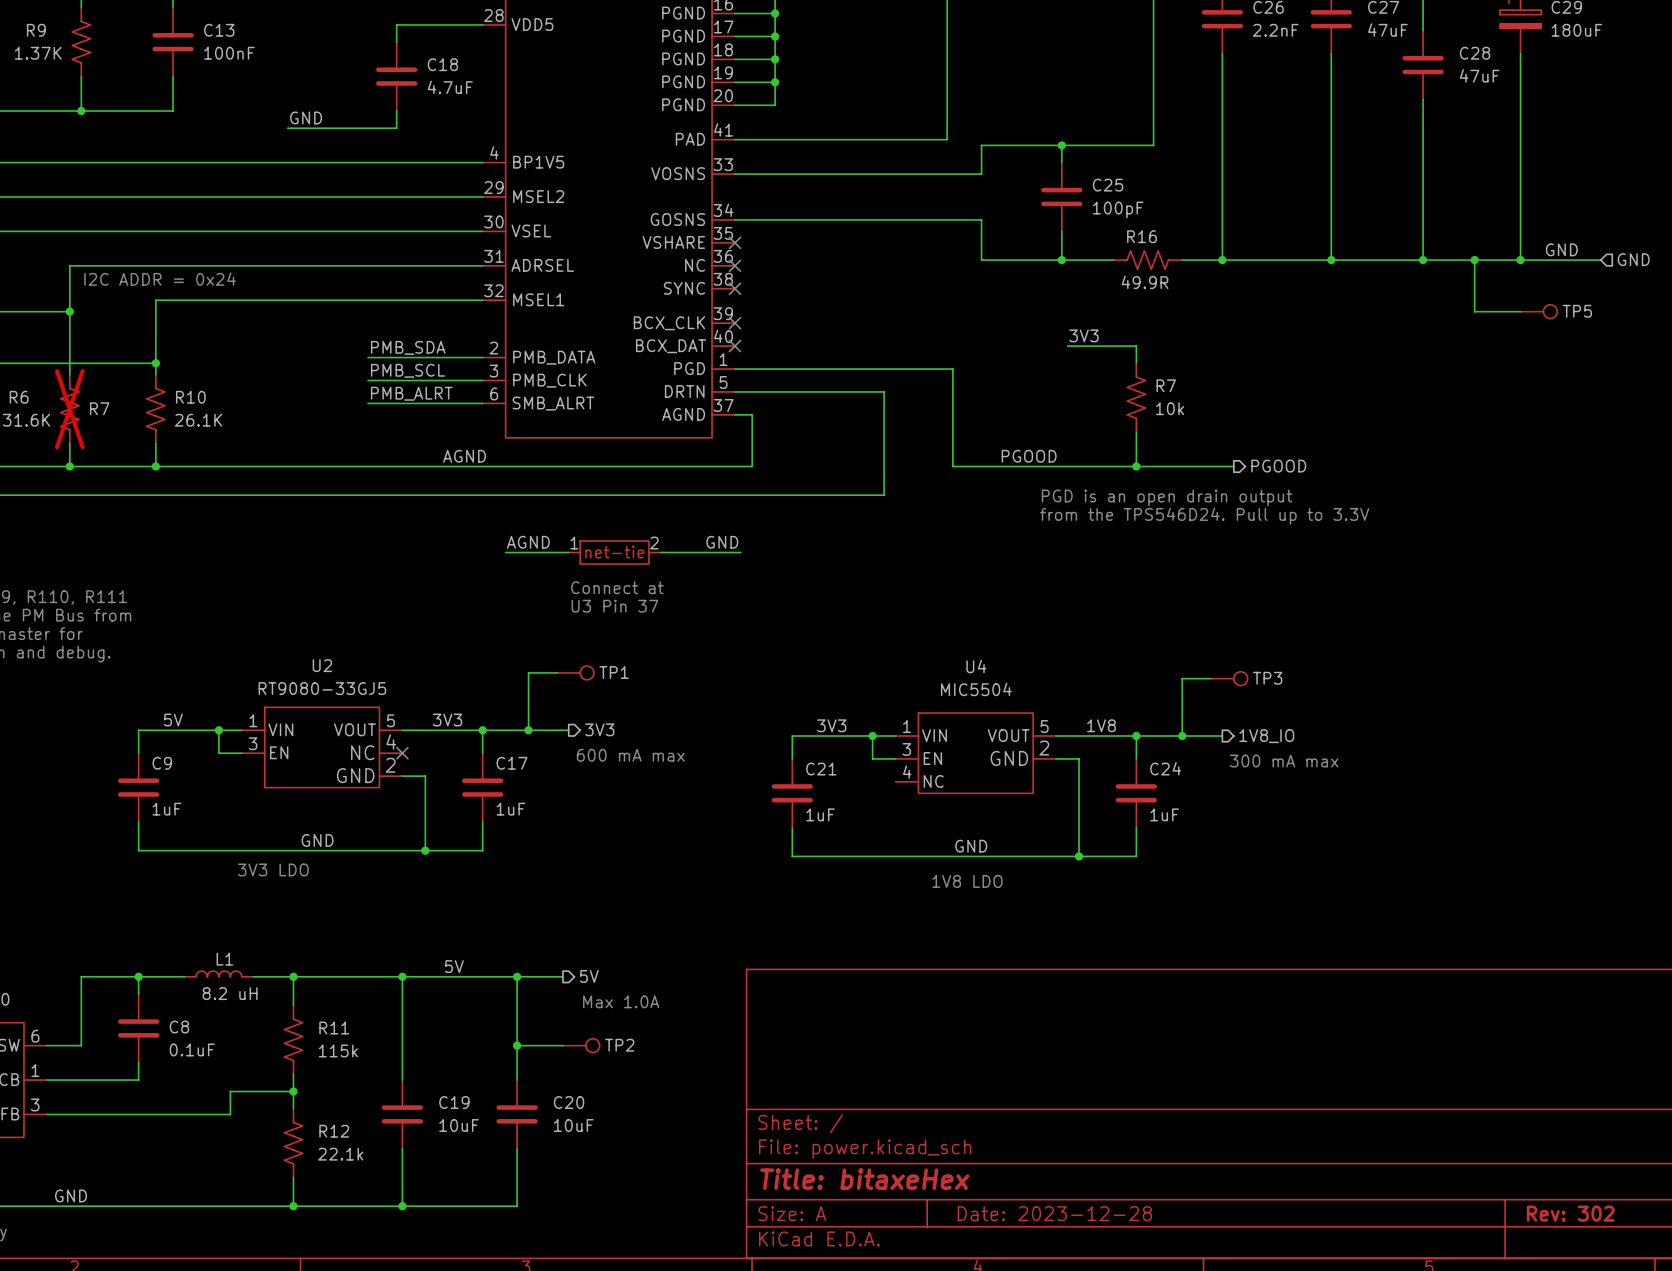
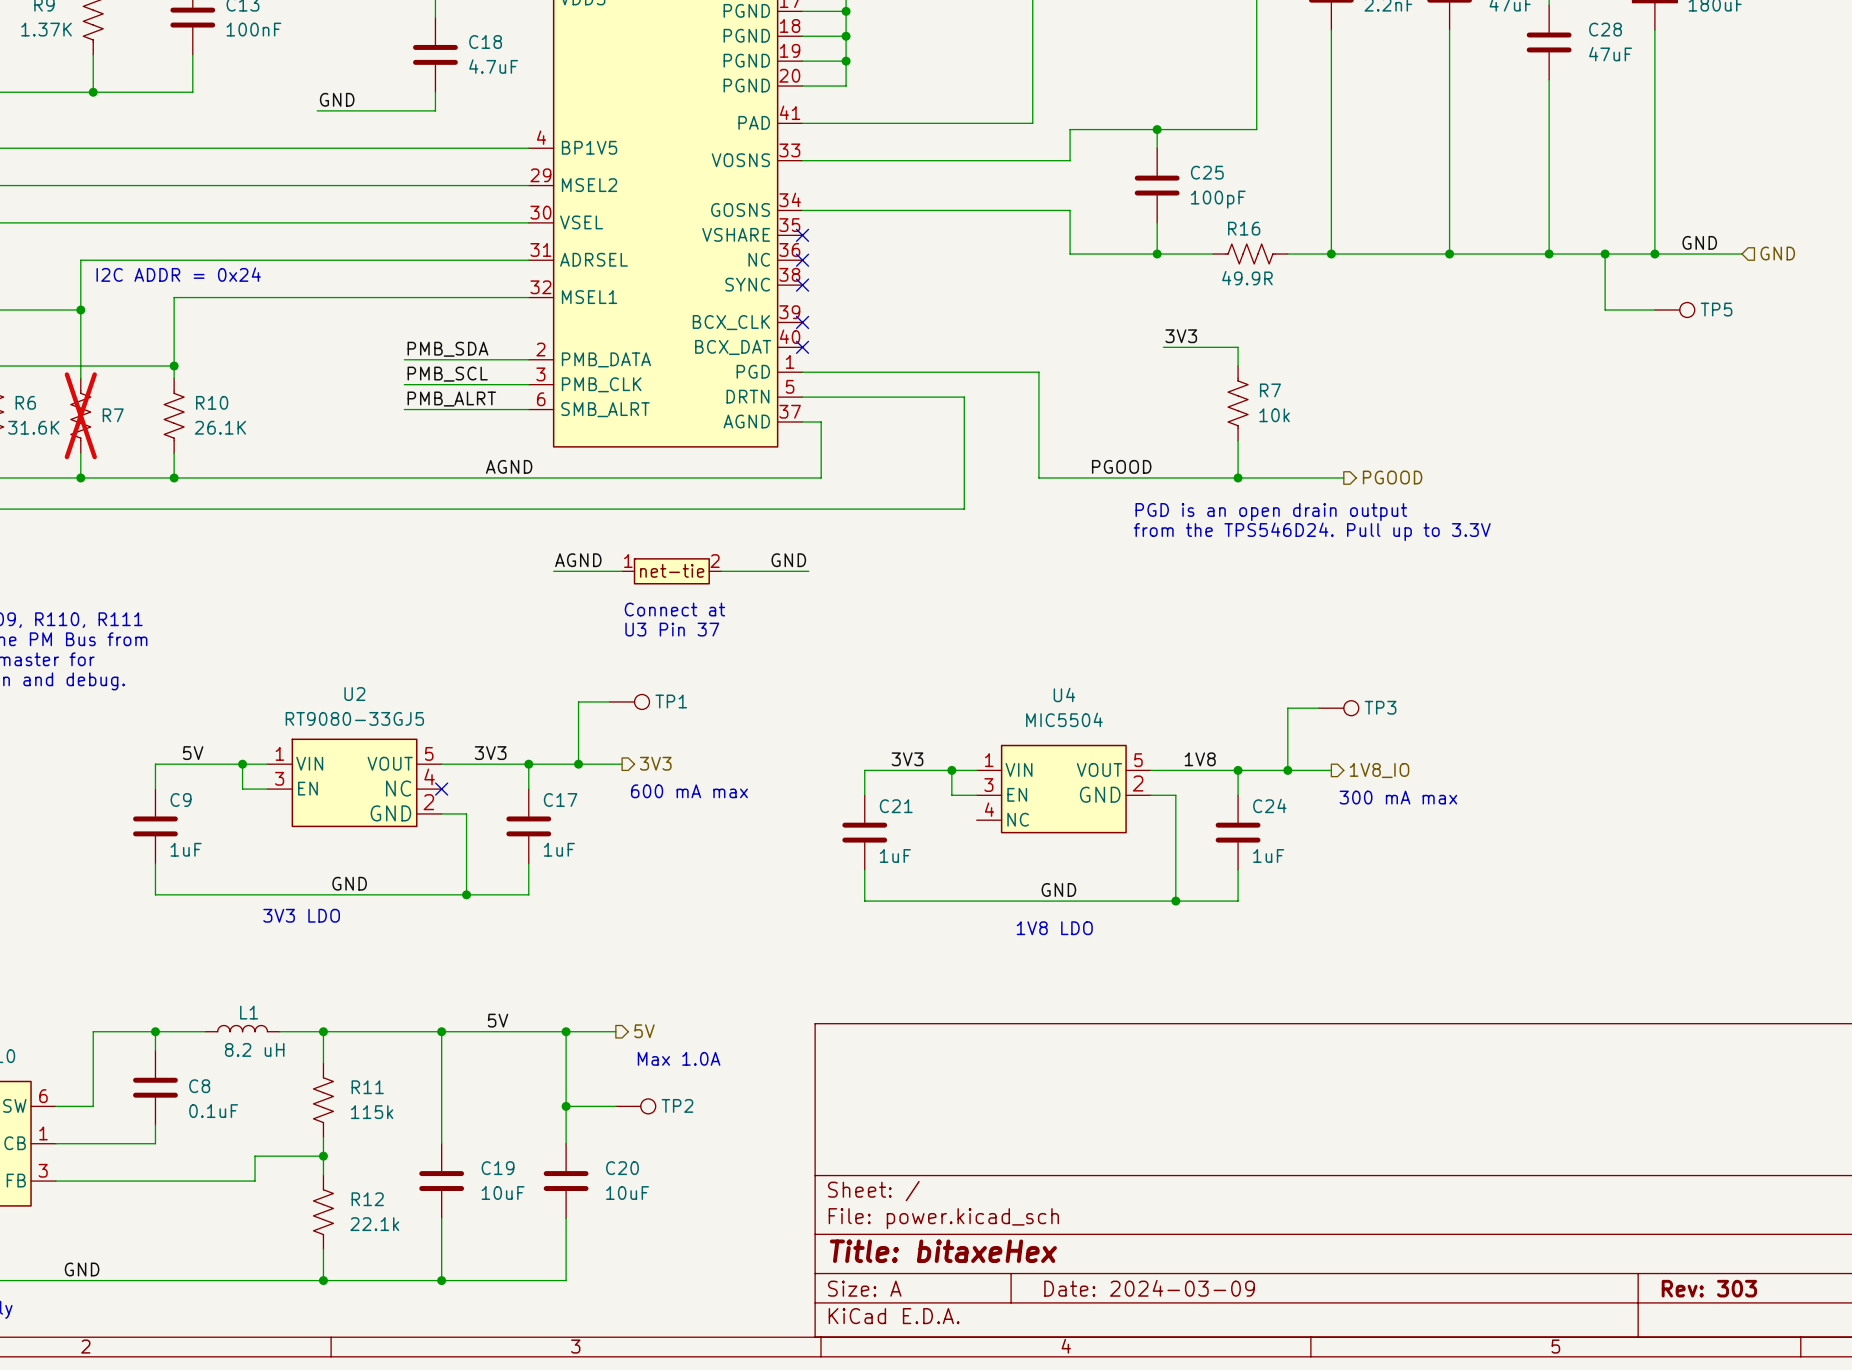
title block: Date: 2023-12-28 (1054, 1213) -> Date: 2024-03-09 (1149, 1288)
title block: Rev: 302 (1570, 1213) -> Rev: 303 (1709, 1288)

